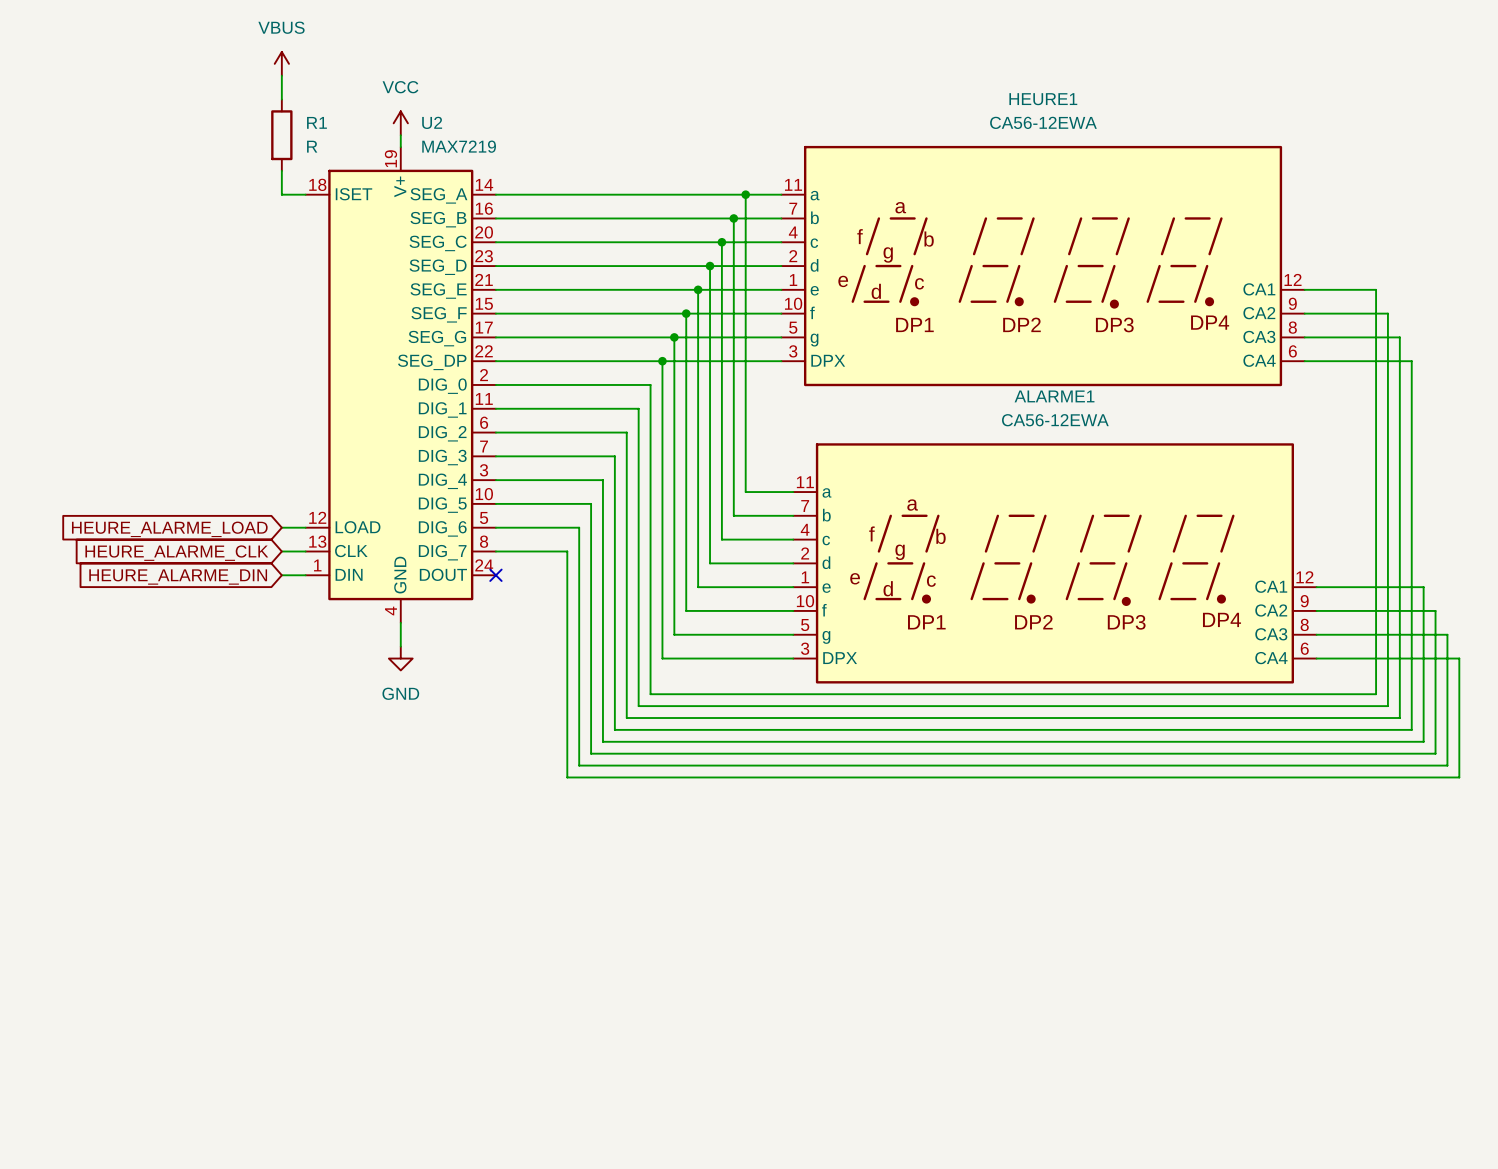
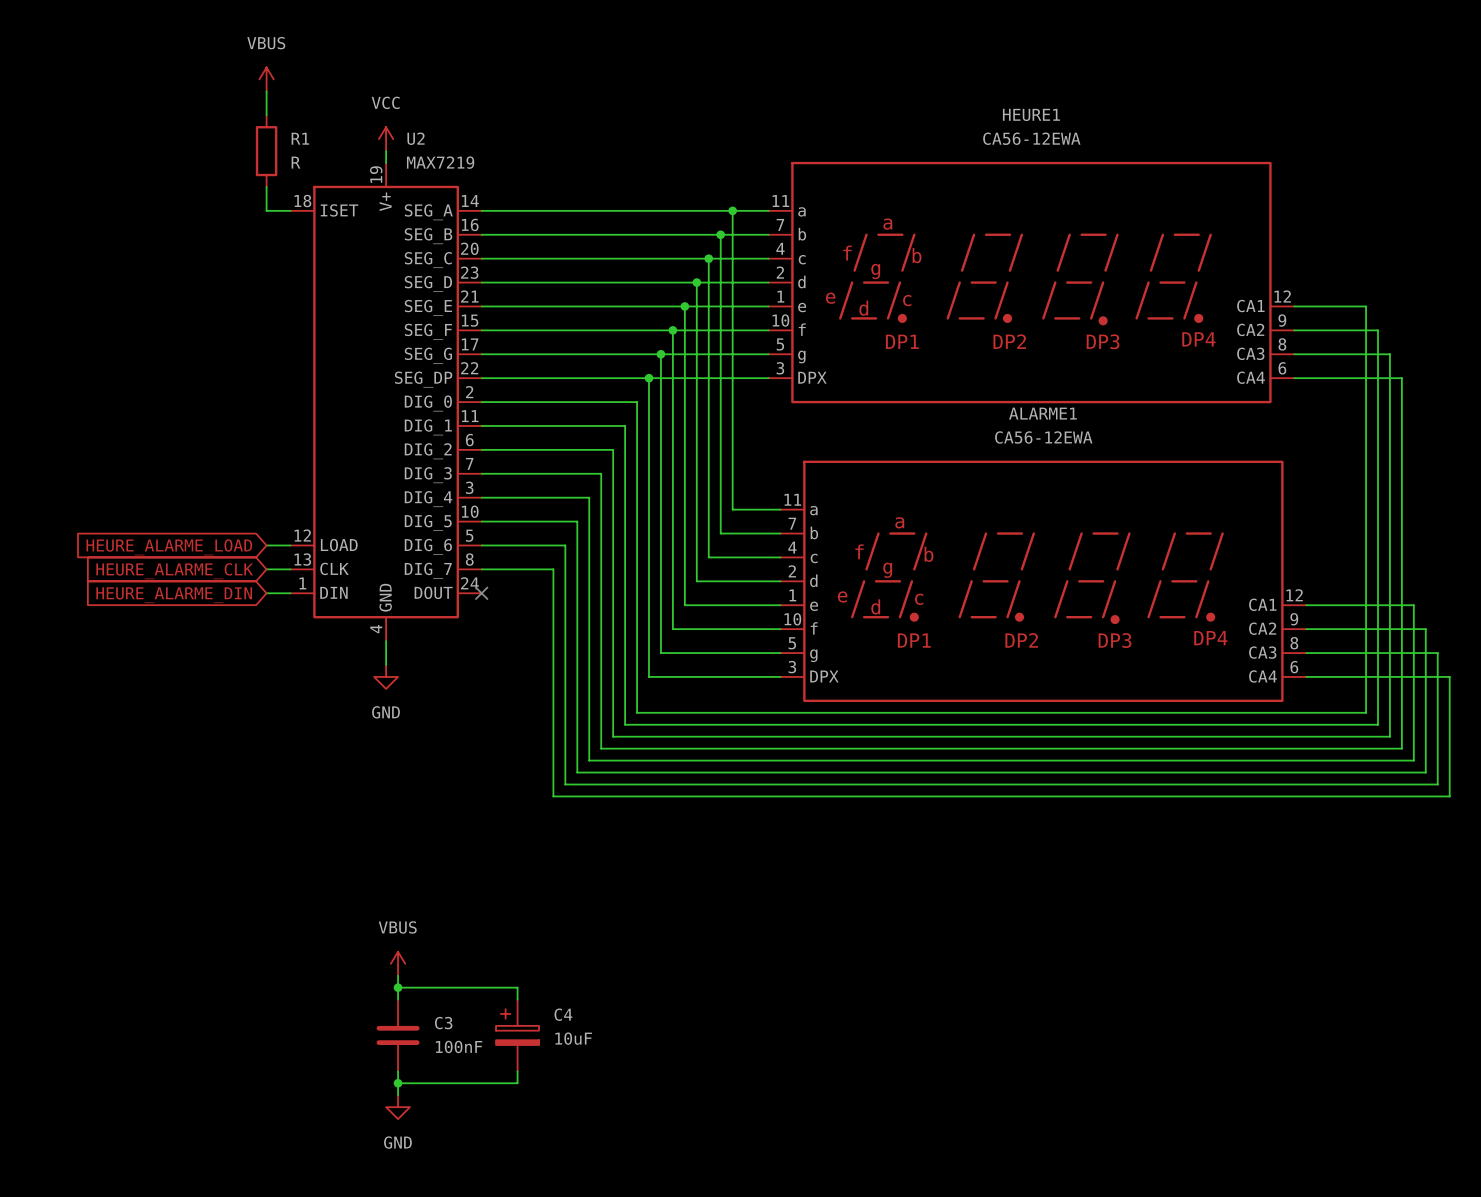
power symbol: none -> VBUS (398, 963)
wire: none -> (398, 975) (398, 999)
wire: none -> (398, 987) (517, 987) (517, 999)
junction: none -> (398, 987)
C3: none -> 100nF (398, 1035)
C4: none -> 10uF (517, 1035)
wire: none -> (398, 1071) (398, 1095)
wire: none -> (517, 1071) (517, 1083) (398, 1083)
junction: none -> (398, 1083)
power symbol: none -> GND (398, 1107)

